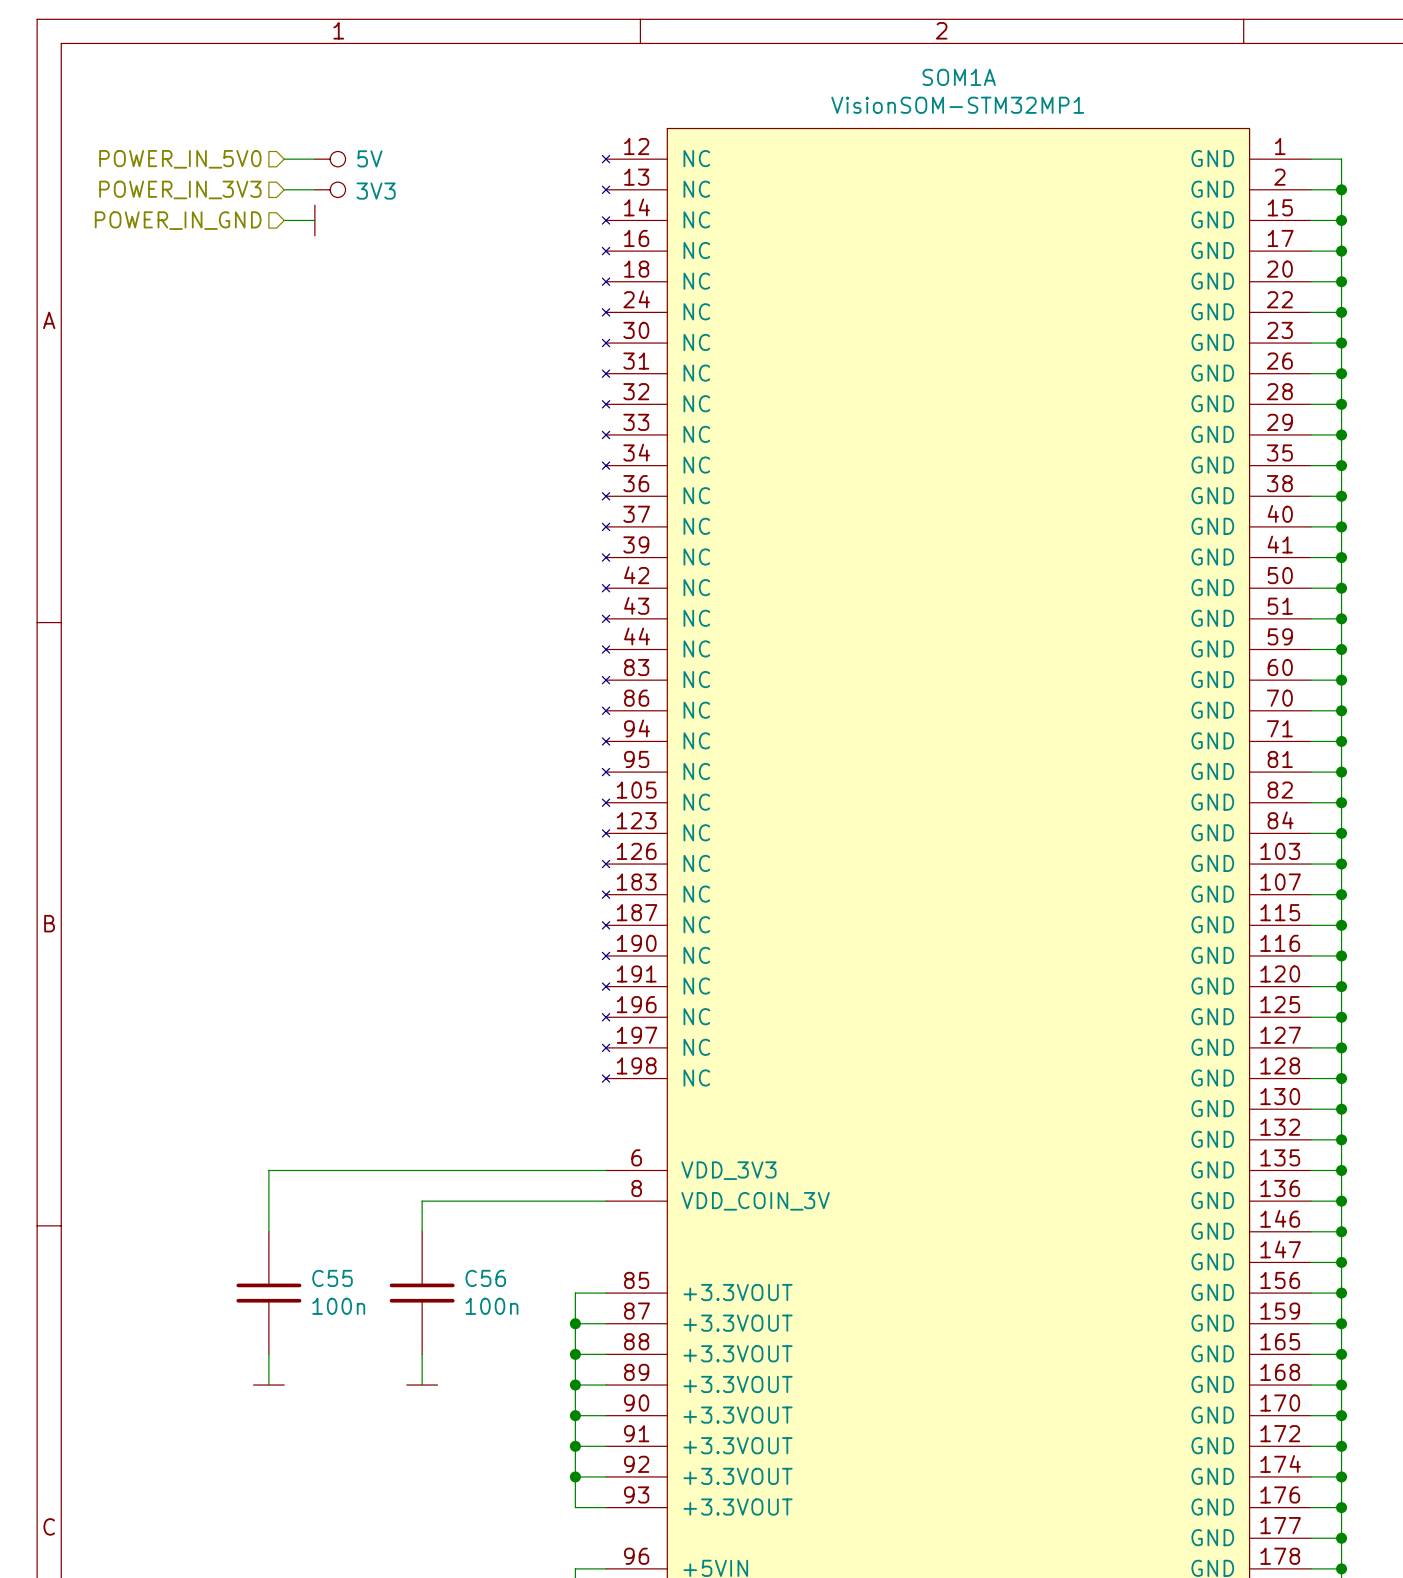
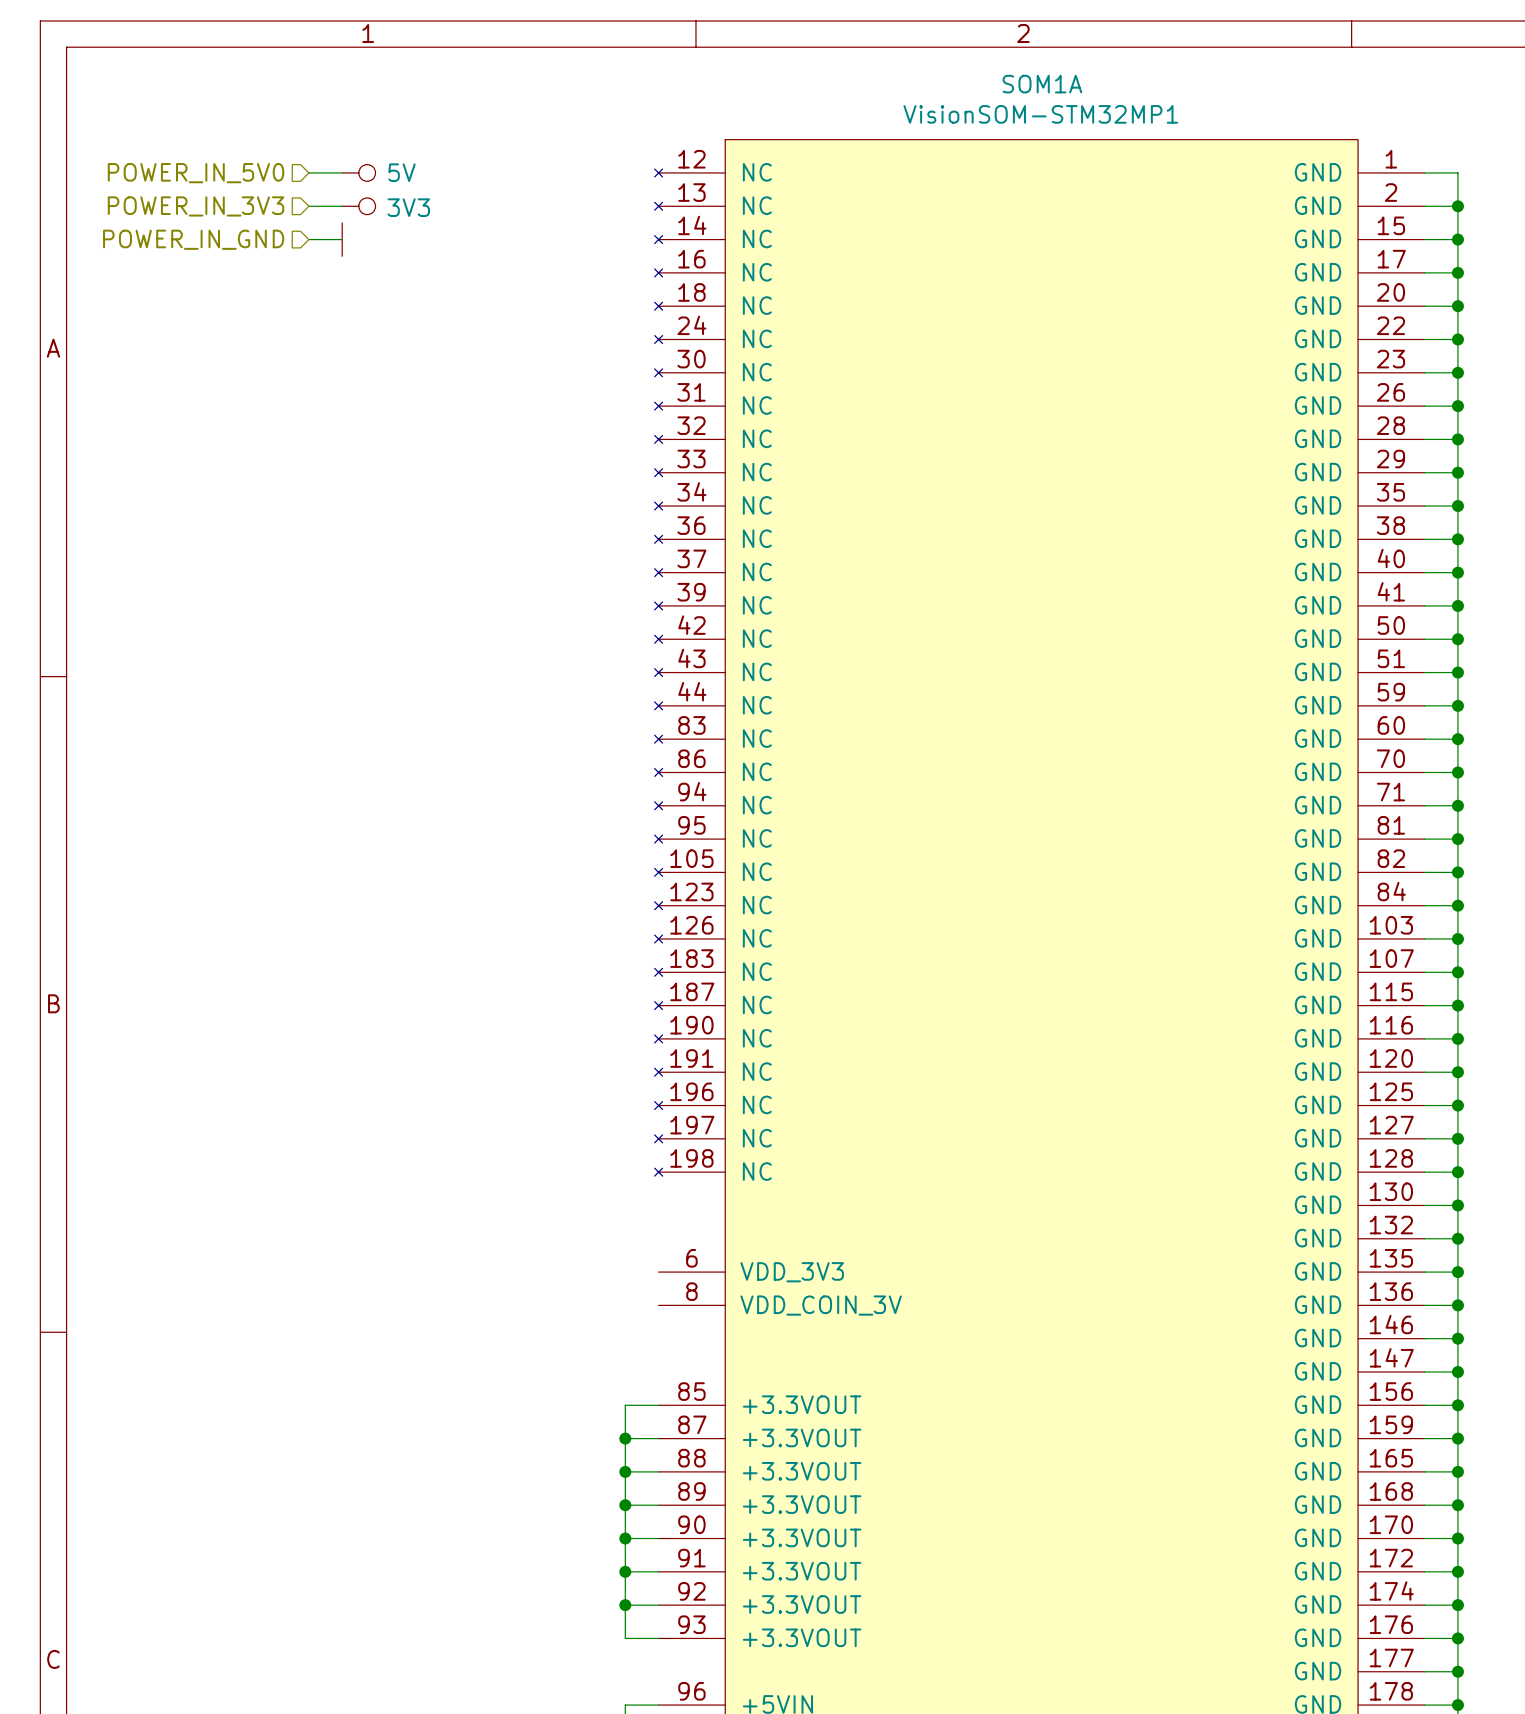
wire: (606, 1170) (268, 1170) (268, 1231) -> none
wire: (606, 1201) (422, 1201) (422, 1231) -> none
C55: 100n (268, 1293) -> none
C56: 100n (422, 1293) -> none
wire: (268, 1354) (268, 1385) -> none
wire: (422, 1354) (422, 1385) -> none
power symbol: (268, 1385) -> none
power symbol: (422, 1385) -> none

